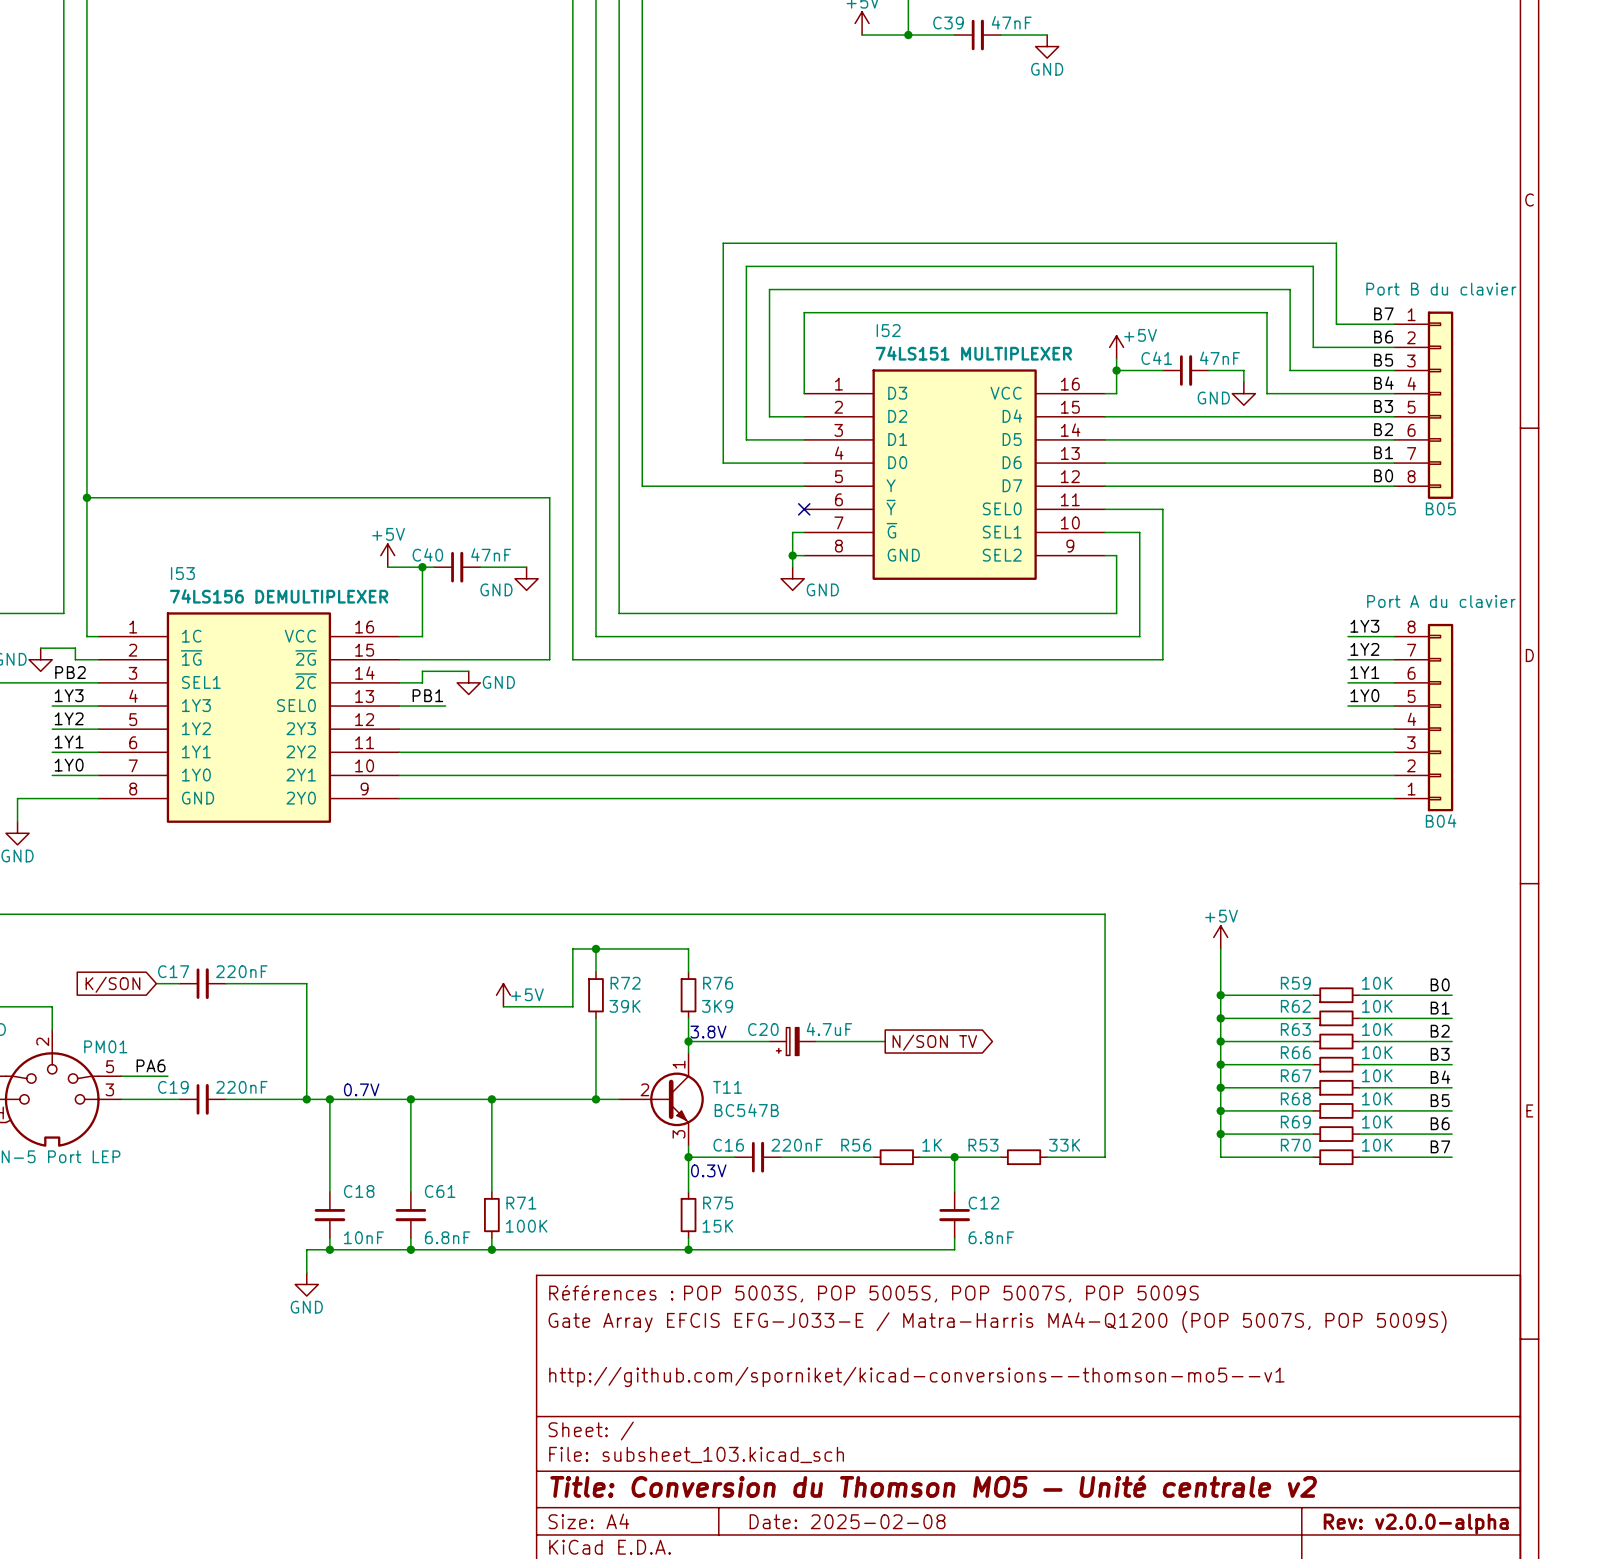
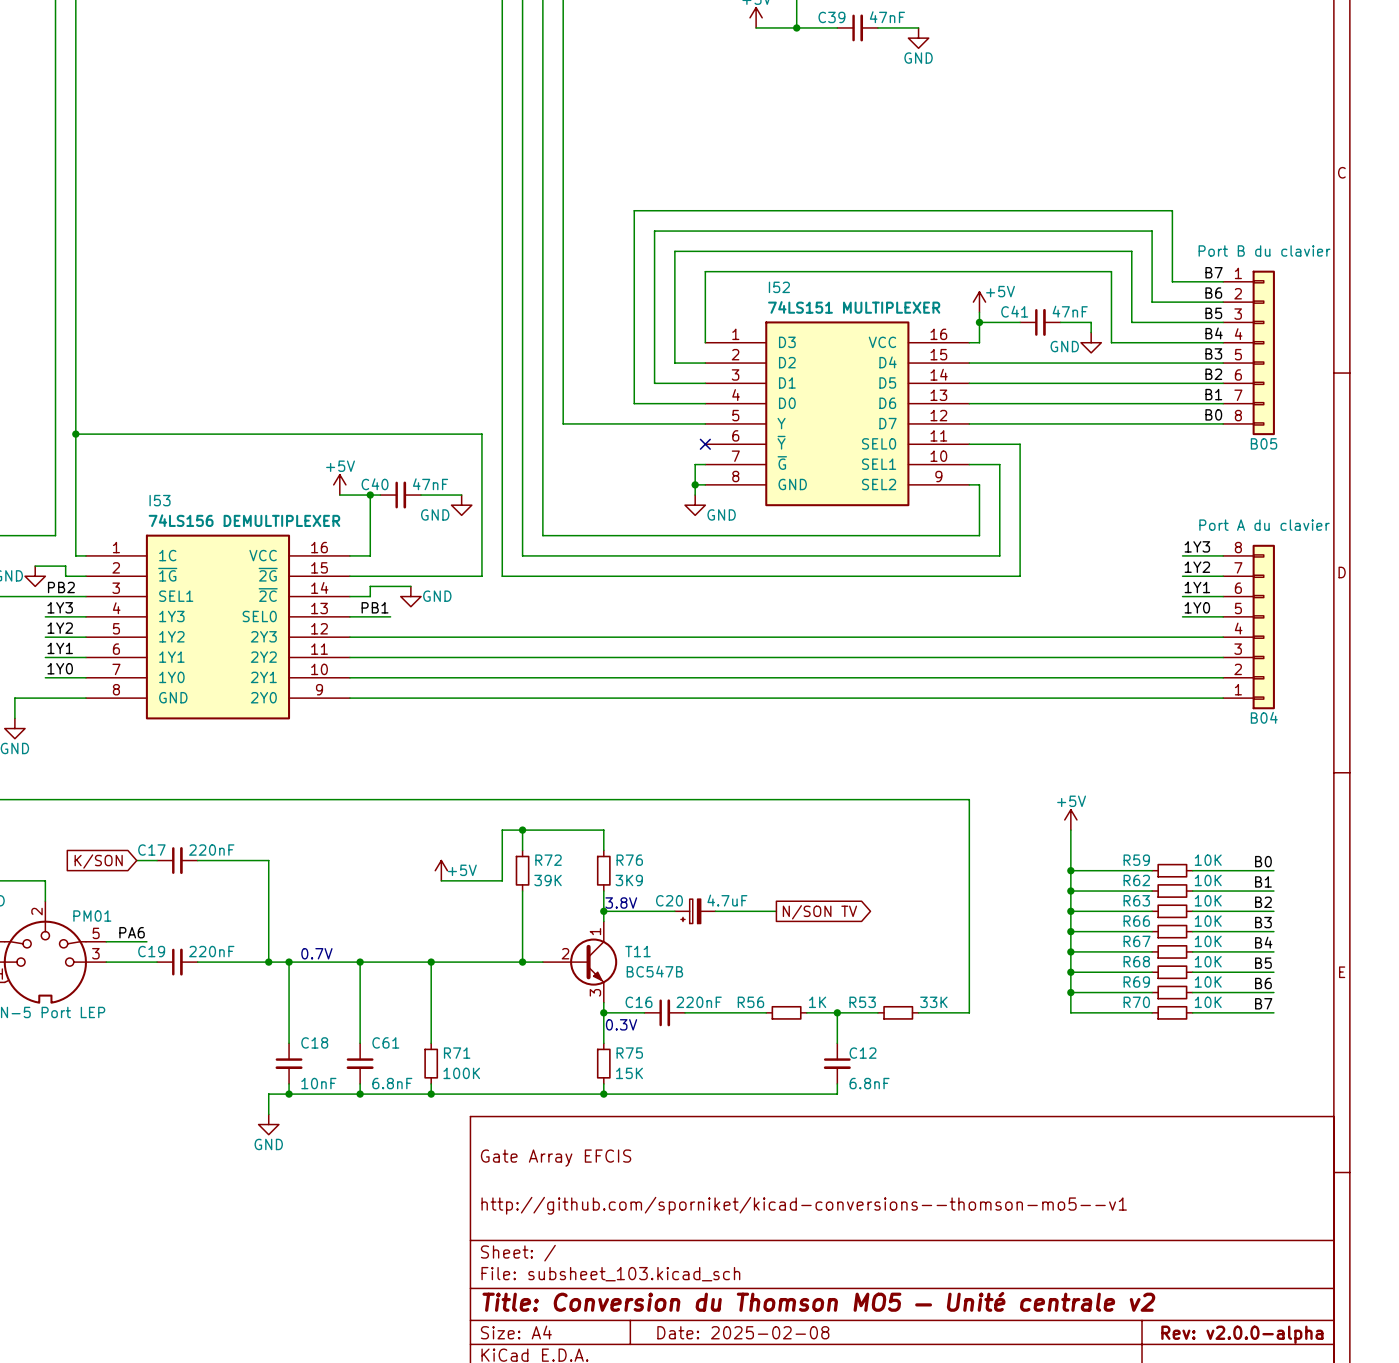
title block: Références : POP 5003S, POP 5005S, POP 5007S, POP 5009S (873, 1293) -> none
title block: Gate Array EFCIS EFG-J033-E / Matra-Harris MA4-Q1200 (POP 5007S, POP 5009S) (997, 1322) -> Gate Array EFCIS (556, 1158)

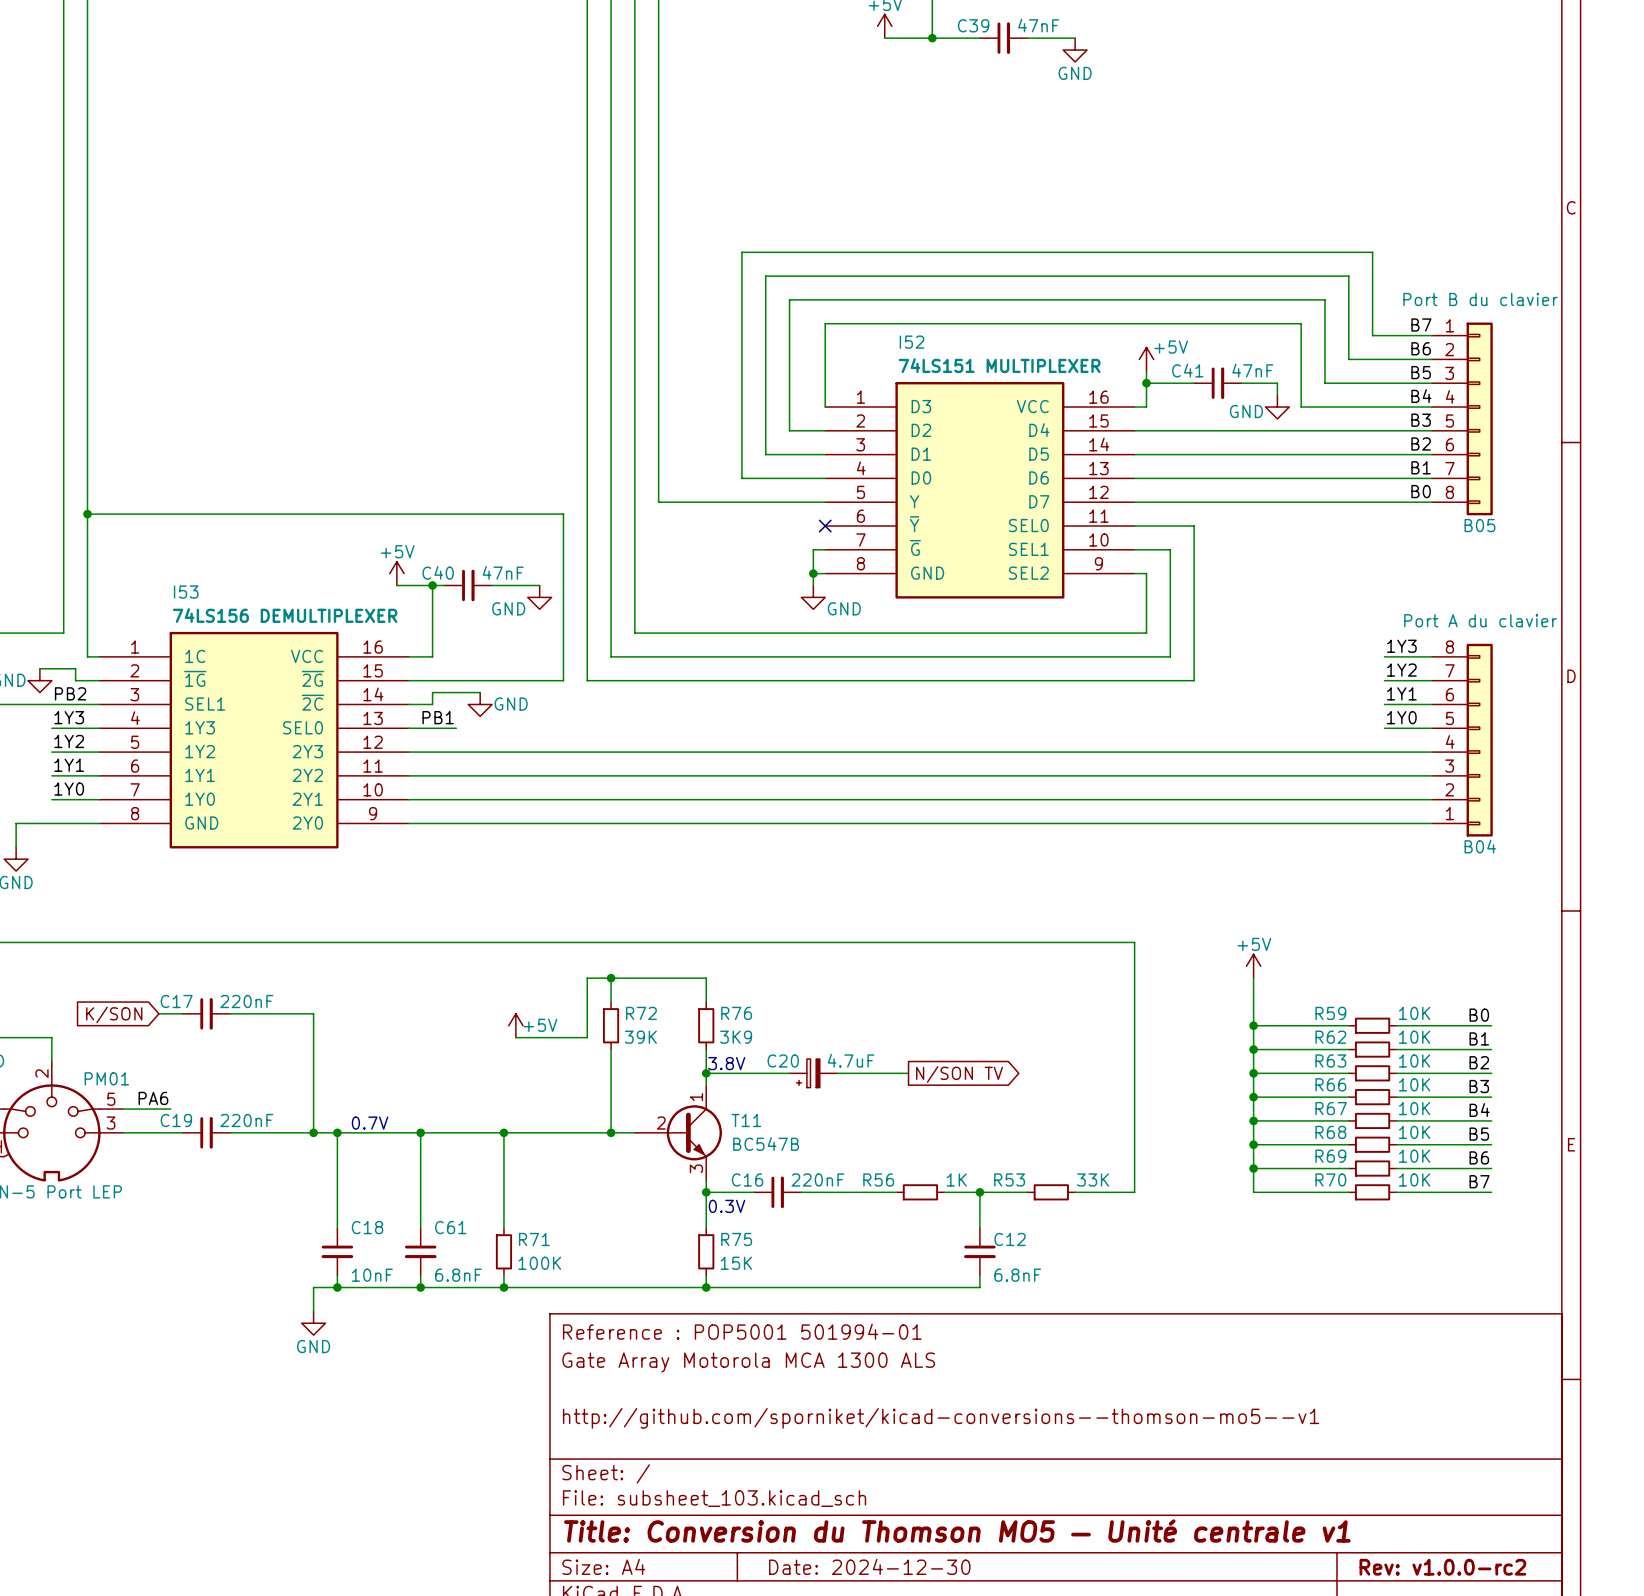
title block: none -> Reference : POP5001 501994-01 (742, 1331)
title block: Gate Array EFCIS (556, 1158) -> Gate Array Motorola MCA 1300 ALS (748, 1362)
title block: Title: Conversion du Thomson MO5 — Unité centrale v2 (818, 1301) -> Title: Conversion du Thomson MO5 — Unité centrale v1 (957, 1531)
title block: Date: 2025-02-08 (743, 1332) -> Date: 2024-12-30 (869, 1566)
title block: Rev: v2.0.0-alpha (1242, 1334) -> Rev: v1.0.0-rc2 (1442, 1567)

